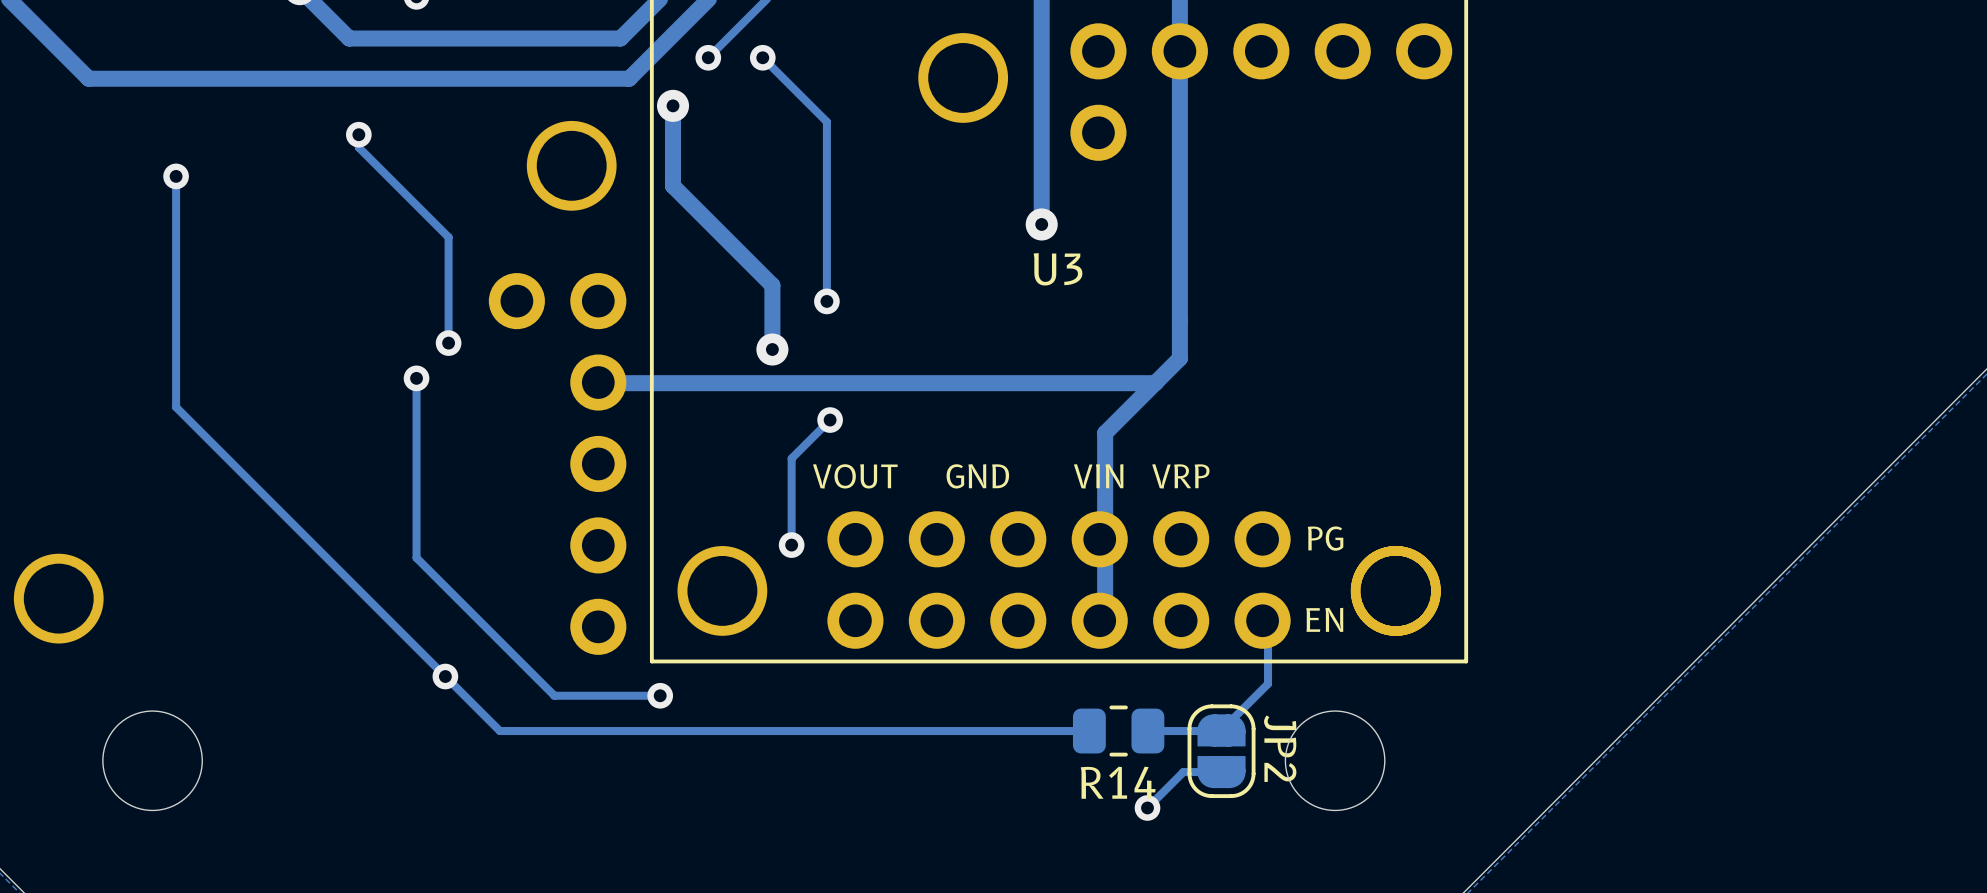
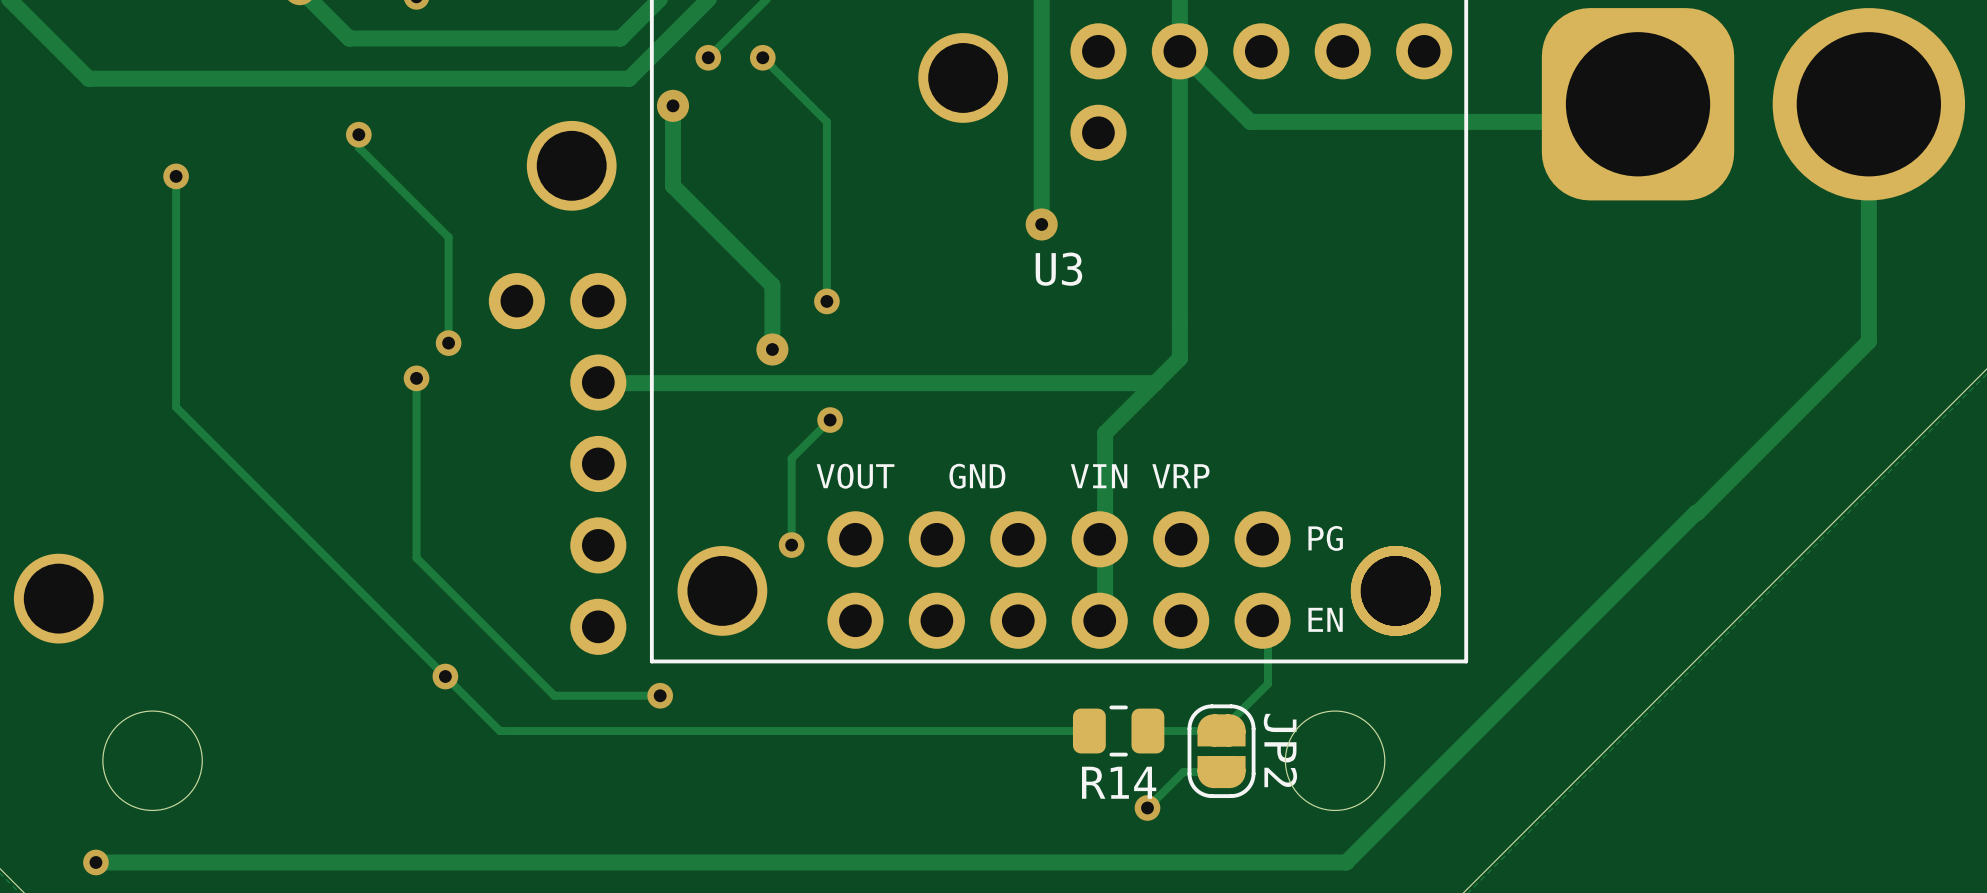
track: none -> (1179, 51) (1250, 121) (1620, 121) (1638, 104)
part: none -> (1753, 104)
track: none -> (1868, 104) (1868, 341) (1346, 862) (95, 862)
via: none -> (95, 862)

